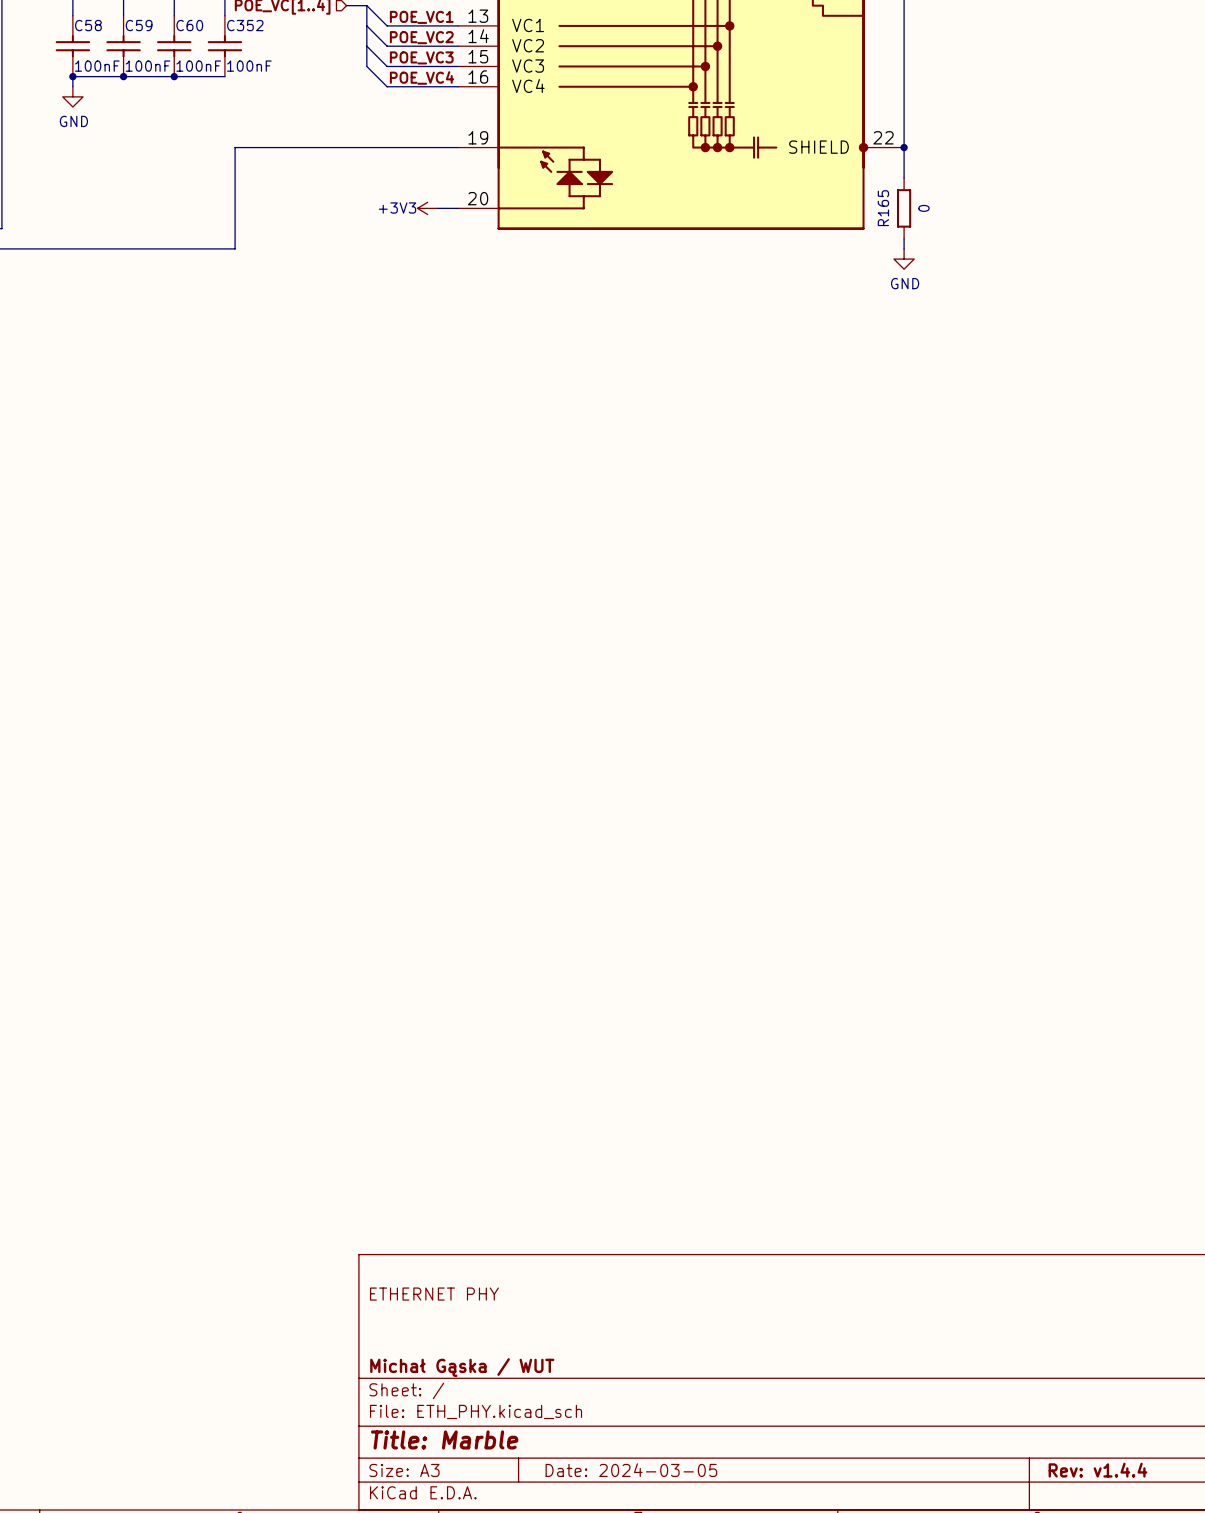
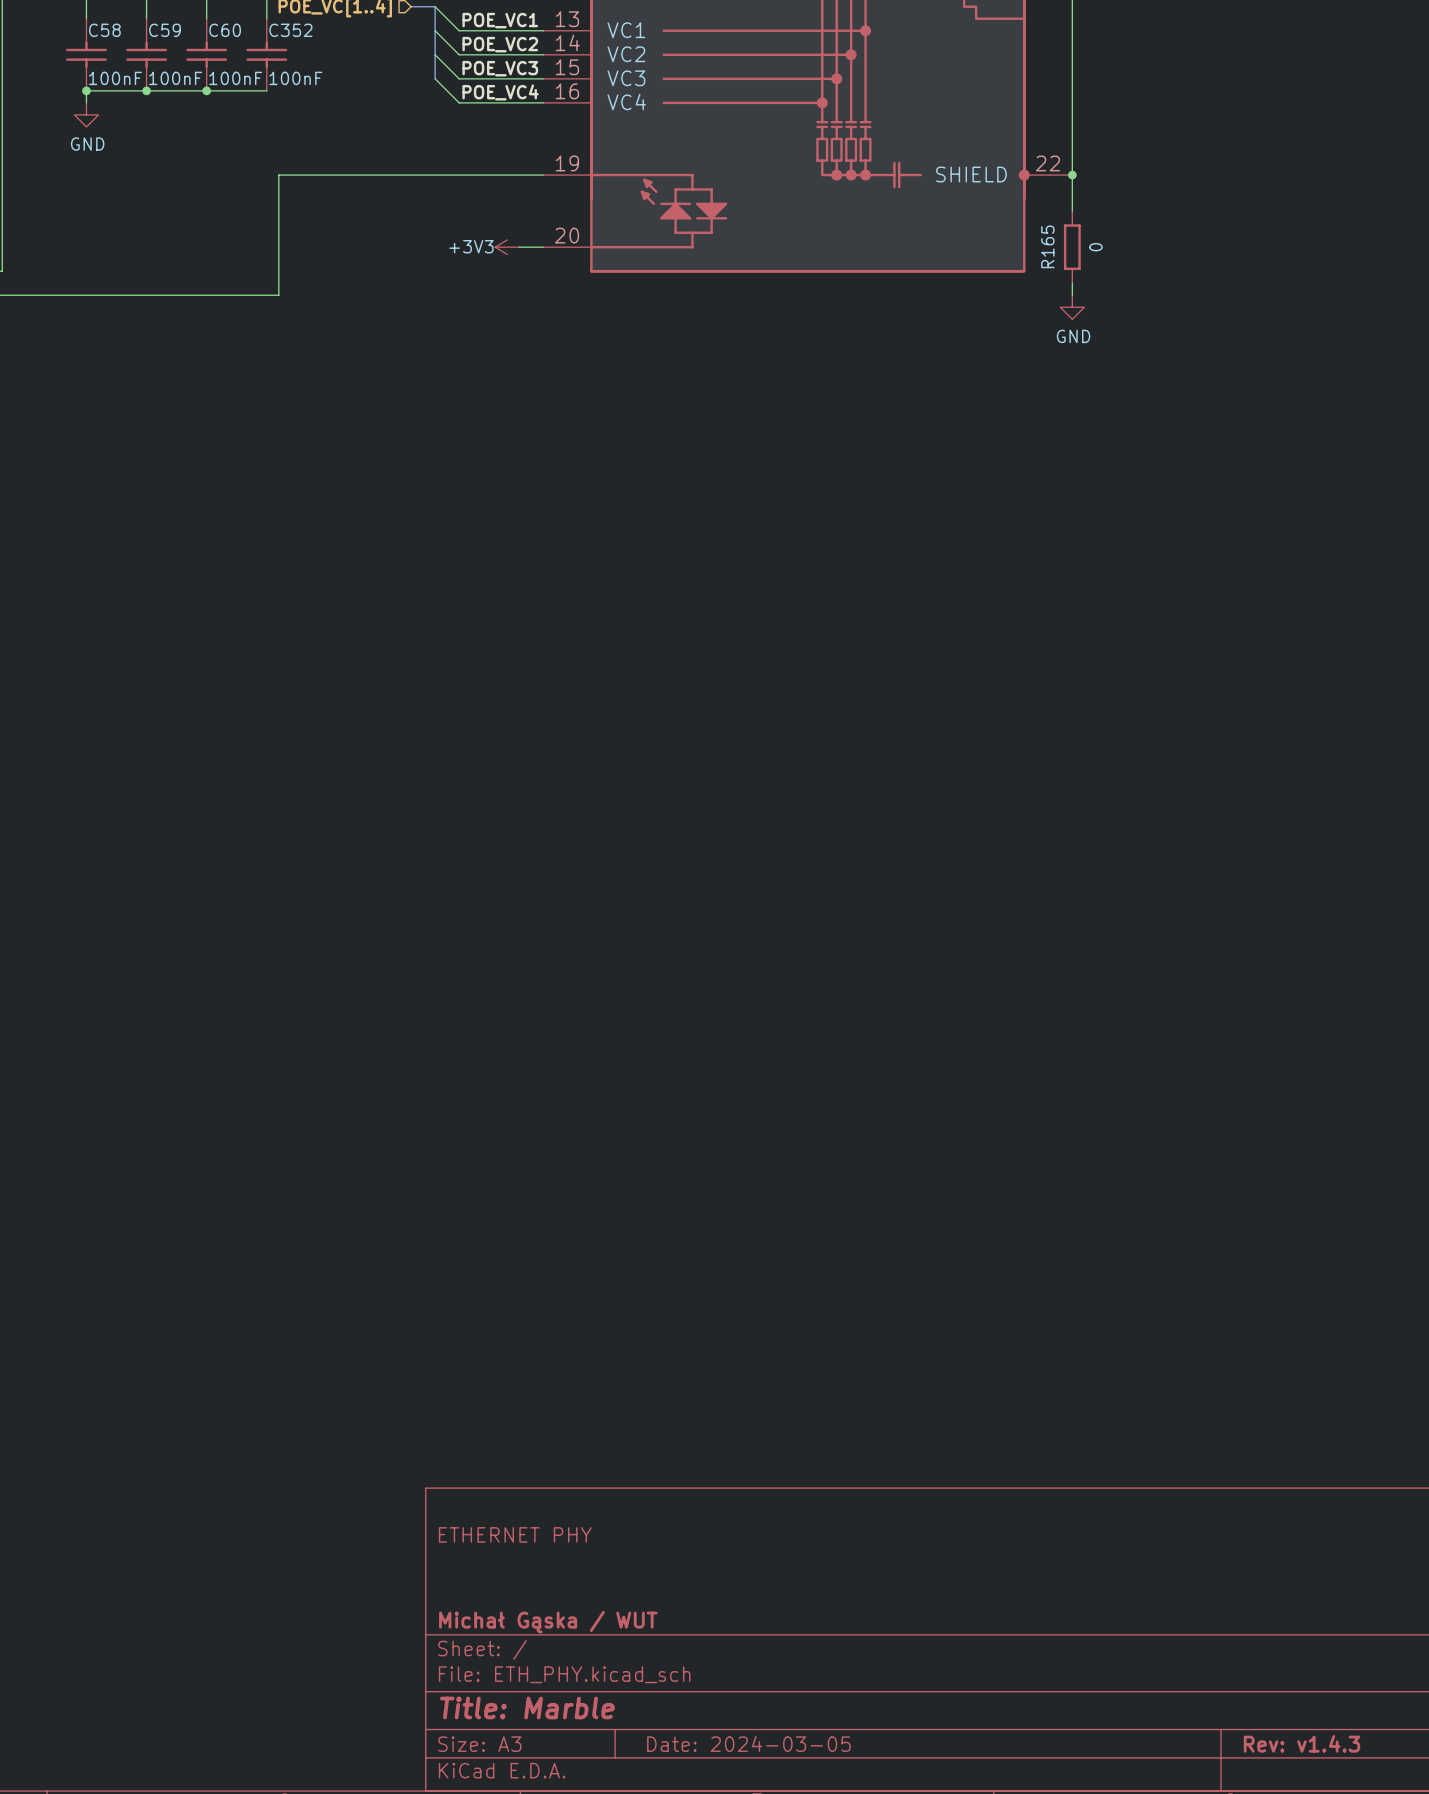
title block: Rev: v1.4.4 (1097, 1470) -> Rev: v1.4.3 (1301, 1743)

